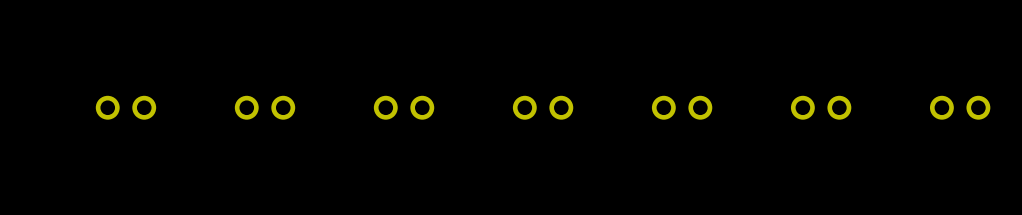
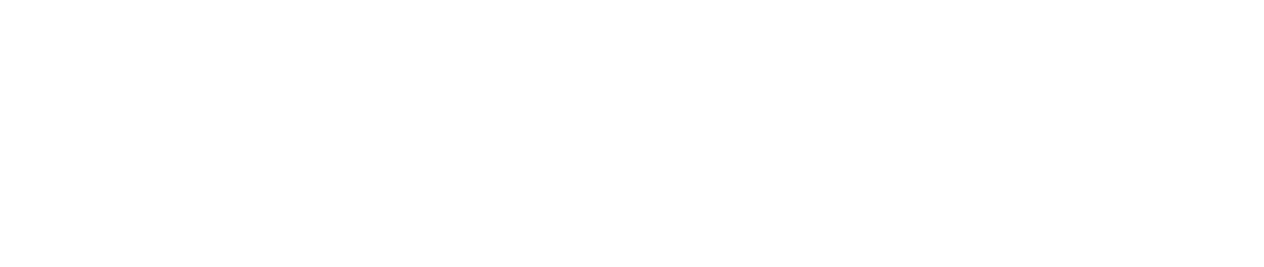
part: (125, 107) -> none
part: (265, 107) -> none
part: (404, 107) -> none
part: (543, 107) -> none
part: (682, 107) -> none
part: (821, 107) -> none
part: (960, 107) -> none

